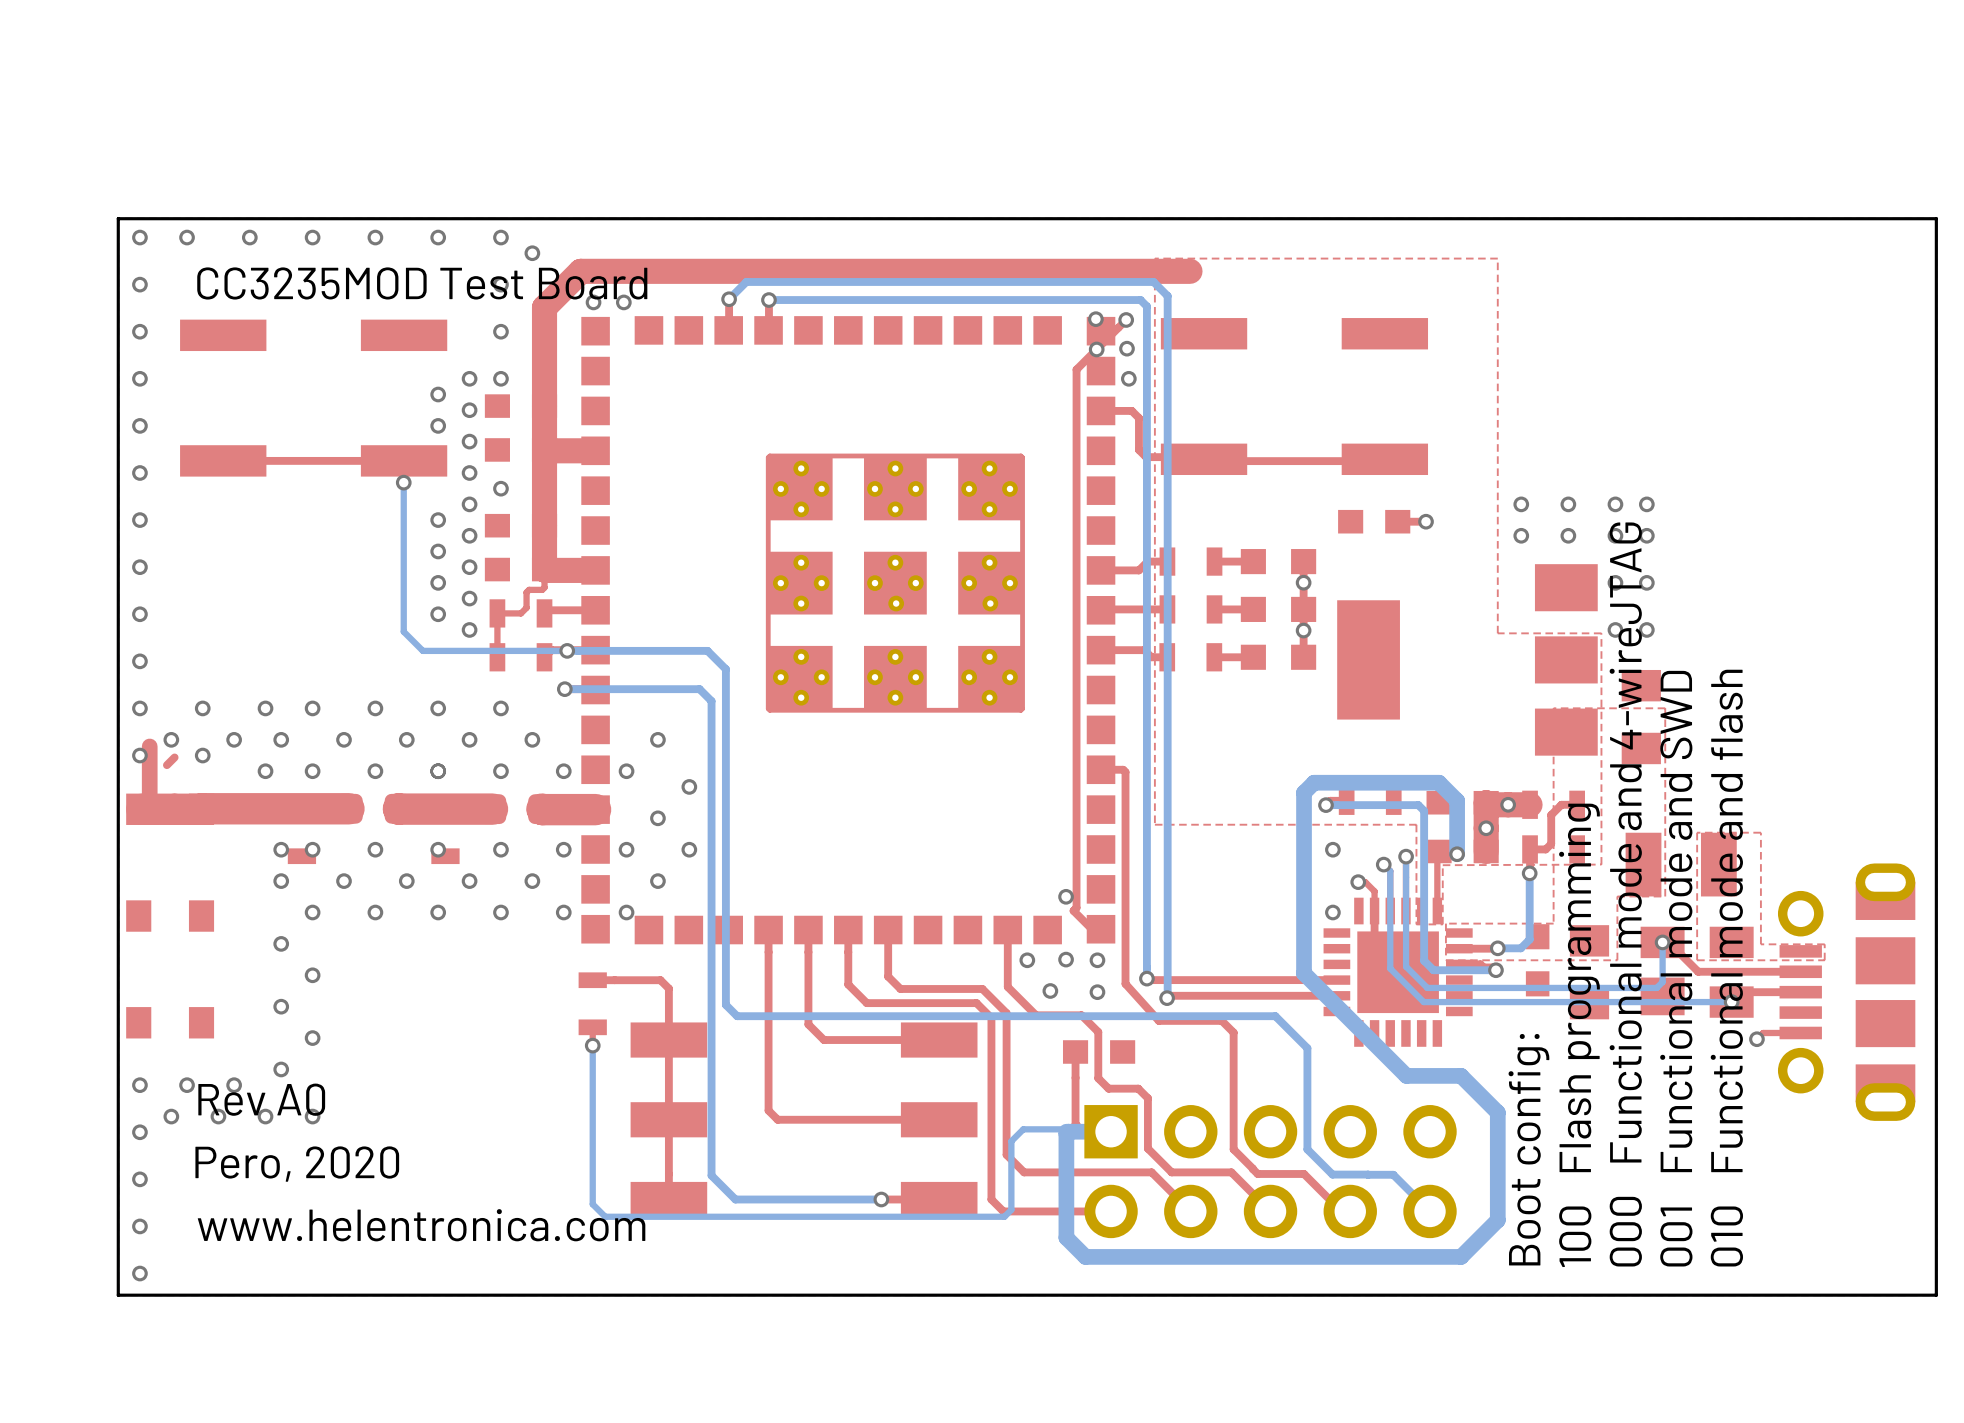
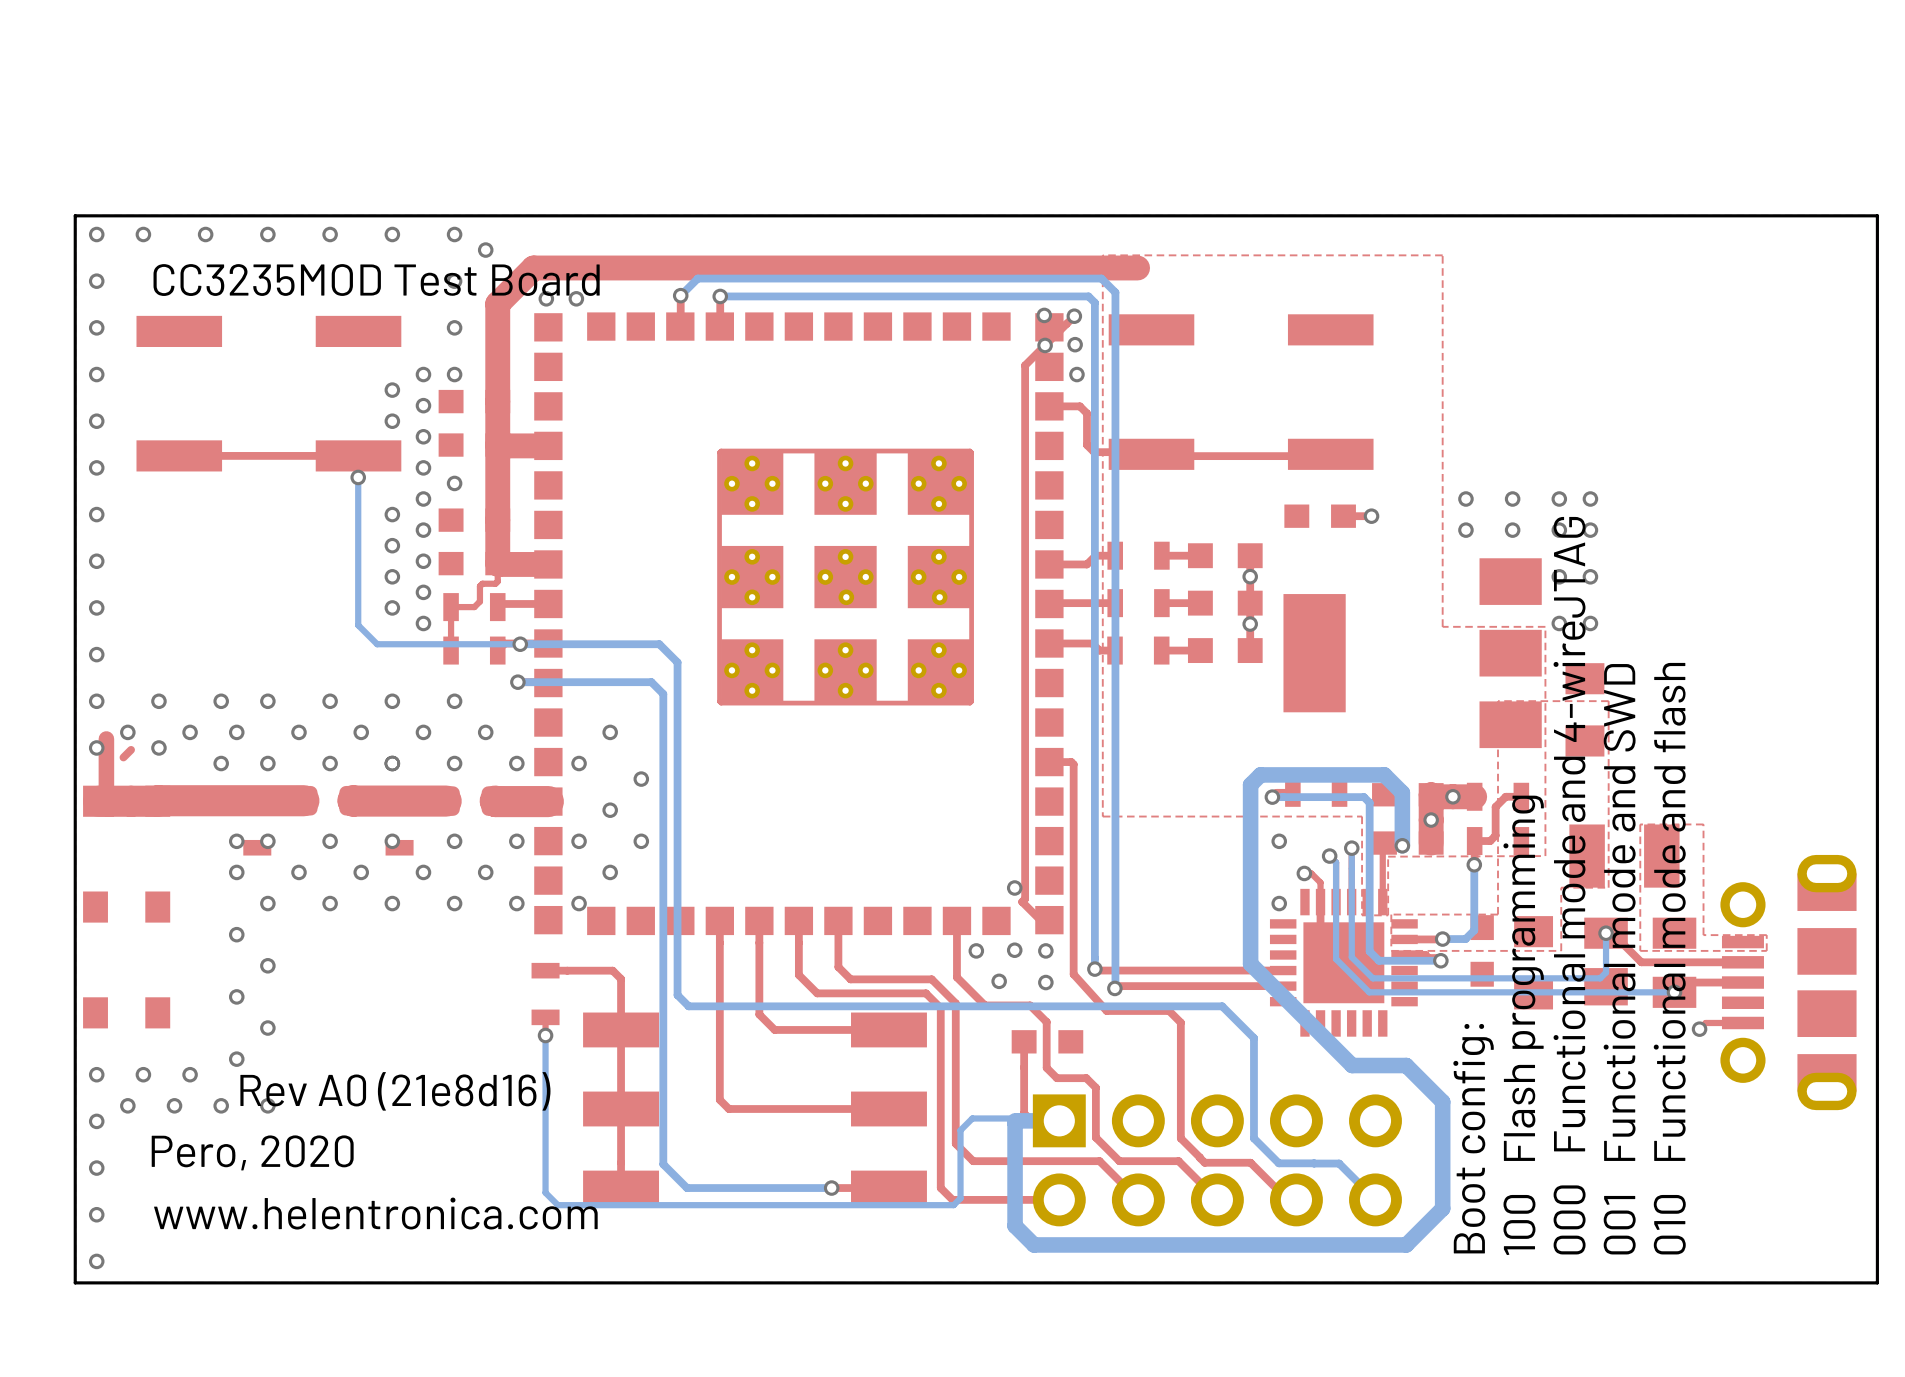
text: Rev A0 (261, 1099) -> none
text: none -> Rev A0 (21e8d16) (395, 1091)

